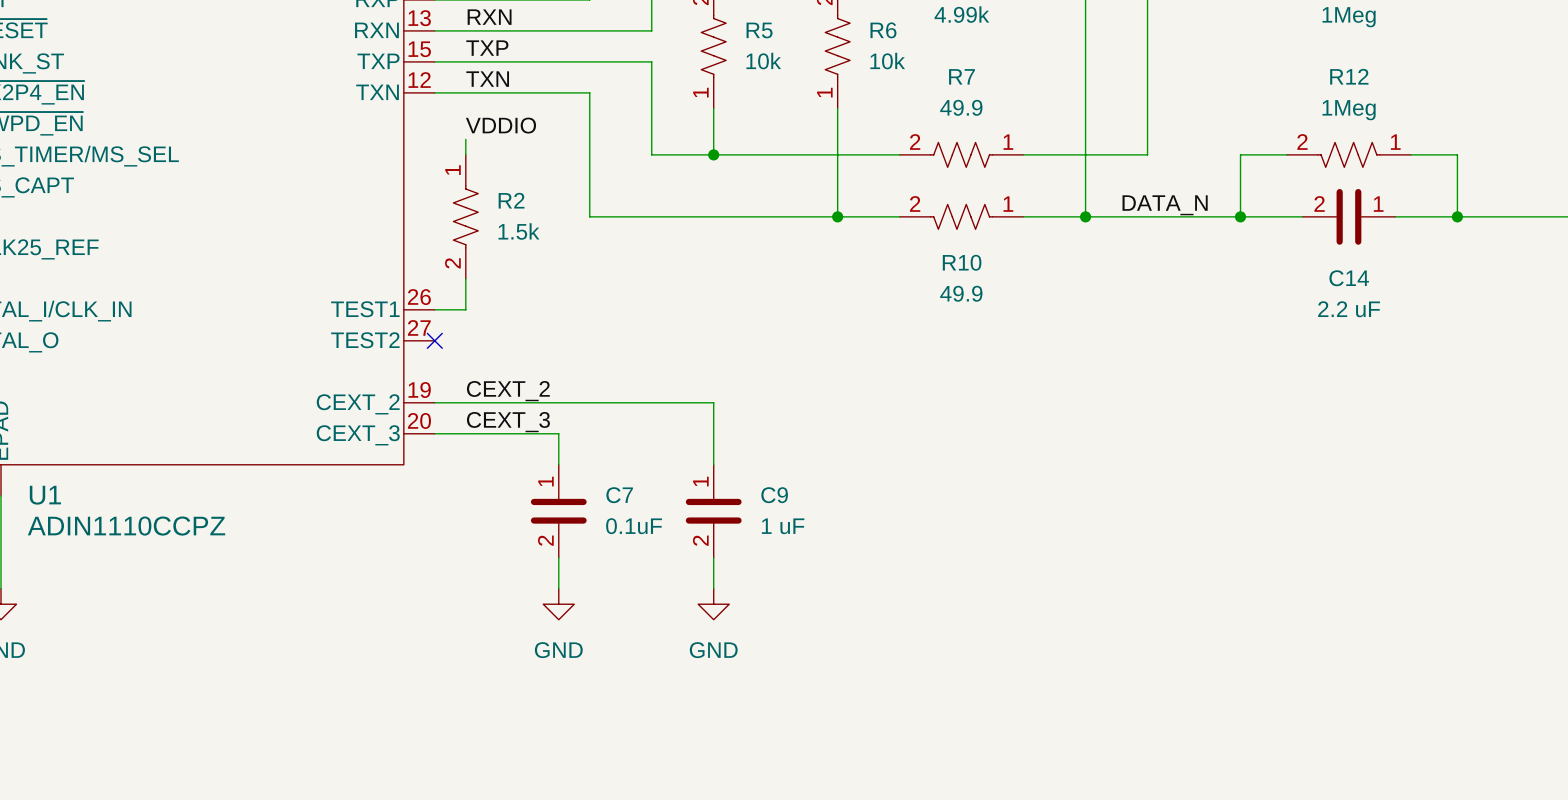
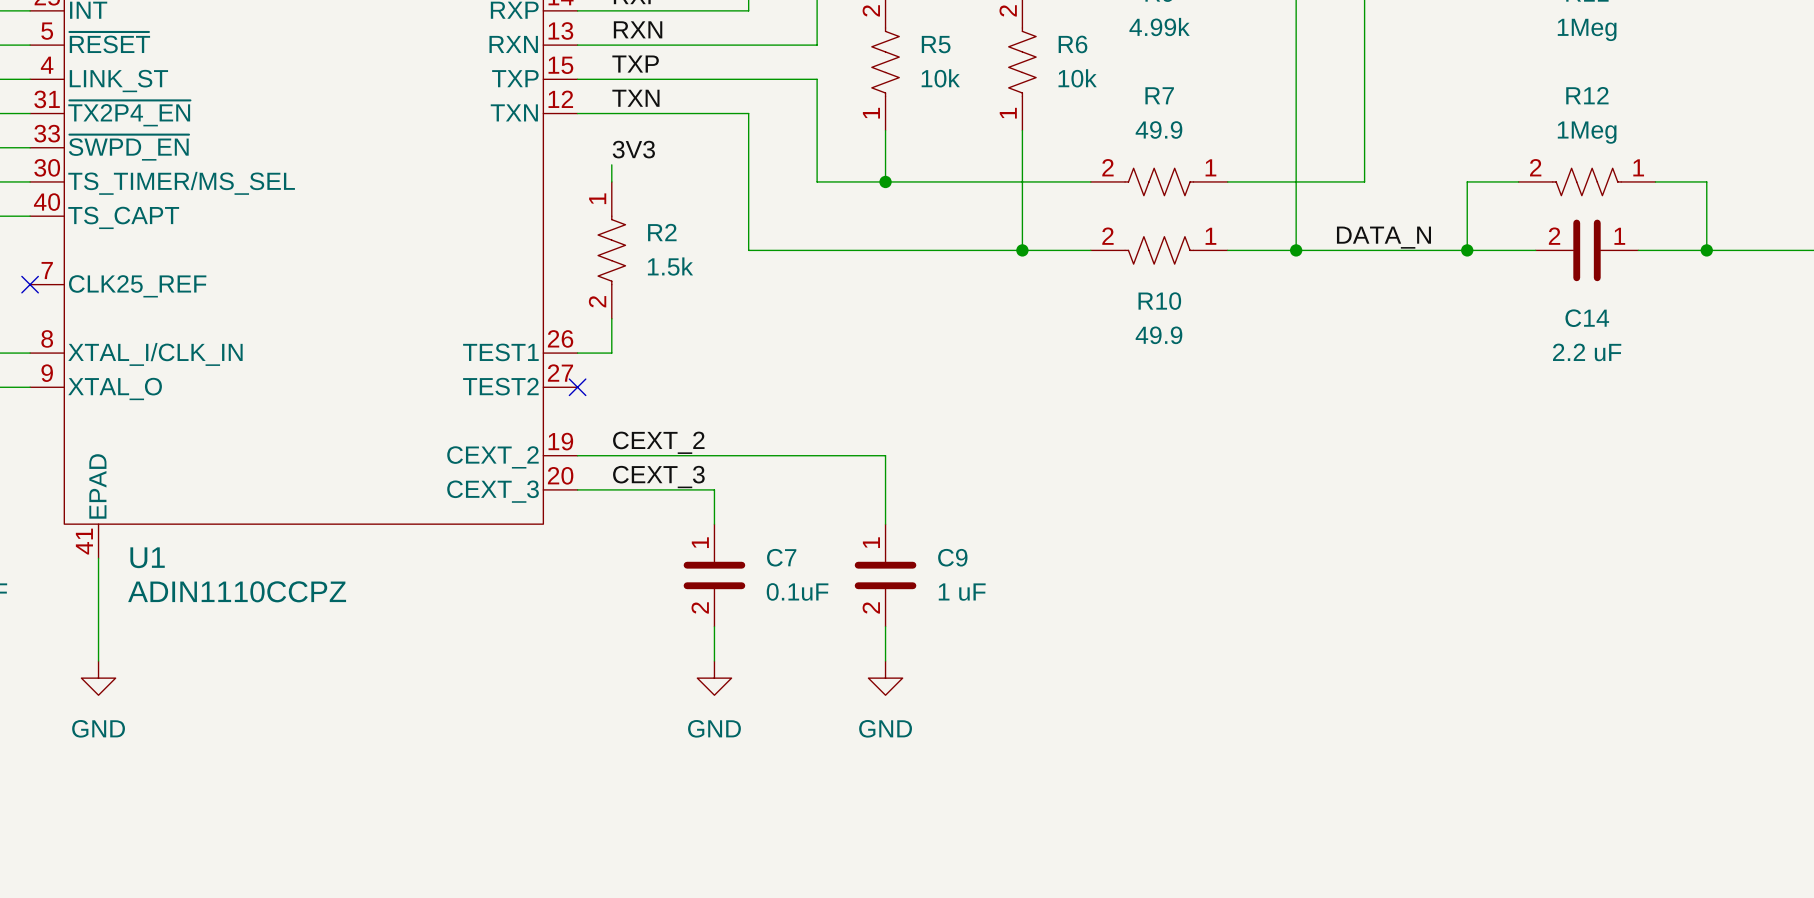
label: VDDIO (500, 125) -> 3V3 (633, 149)

